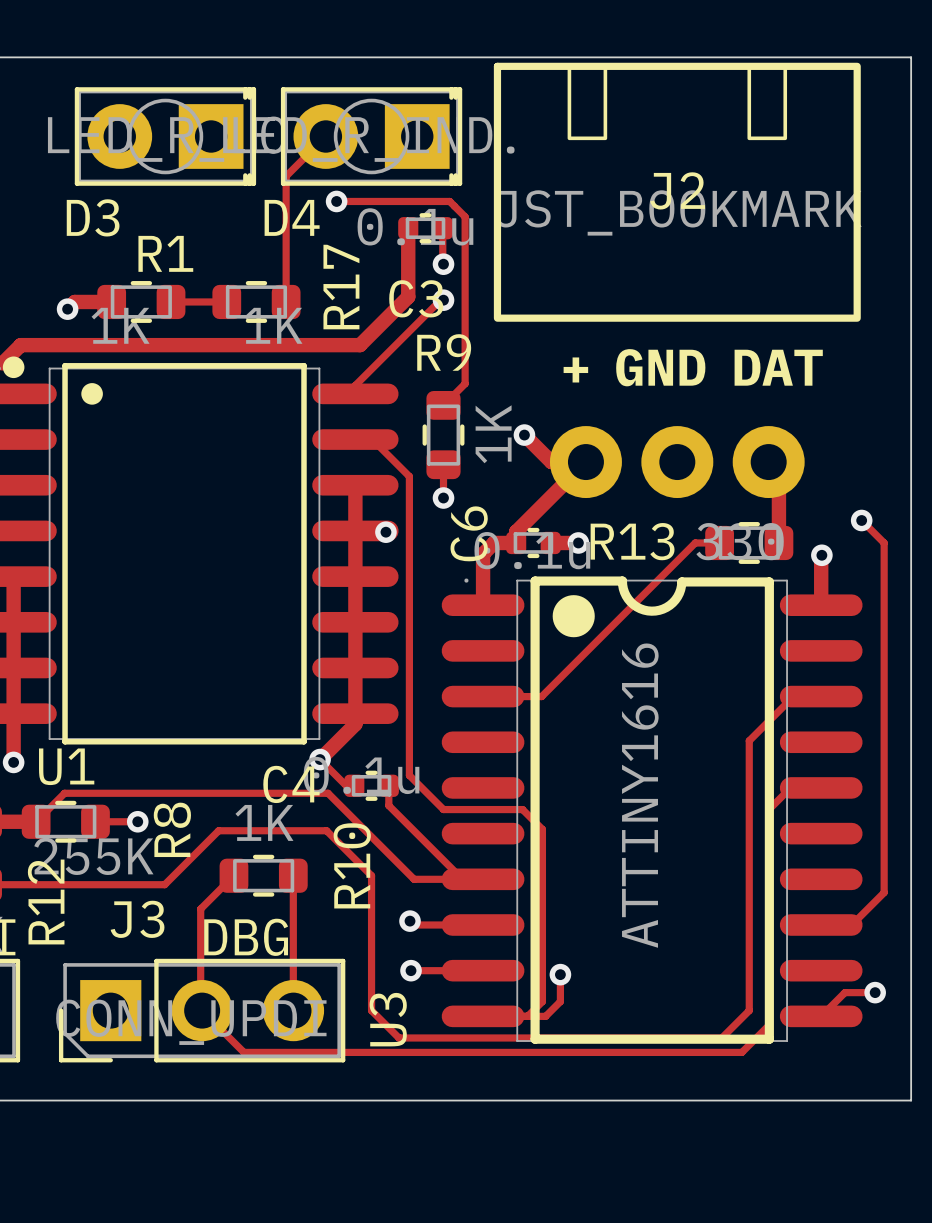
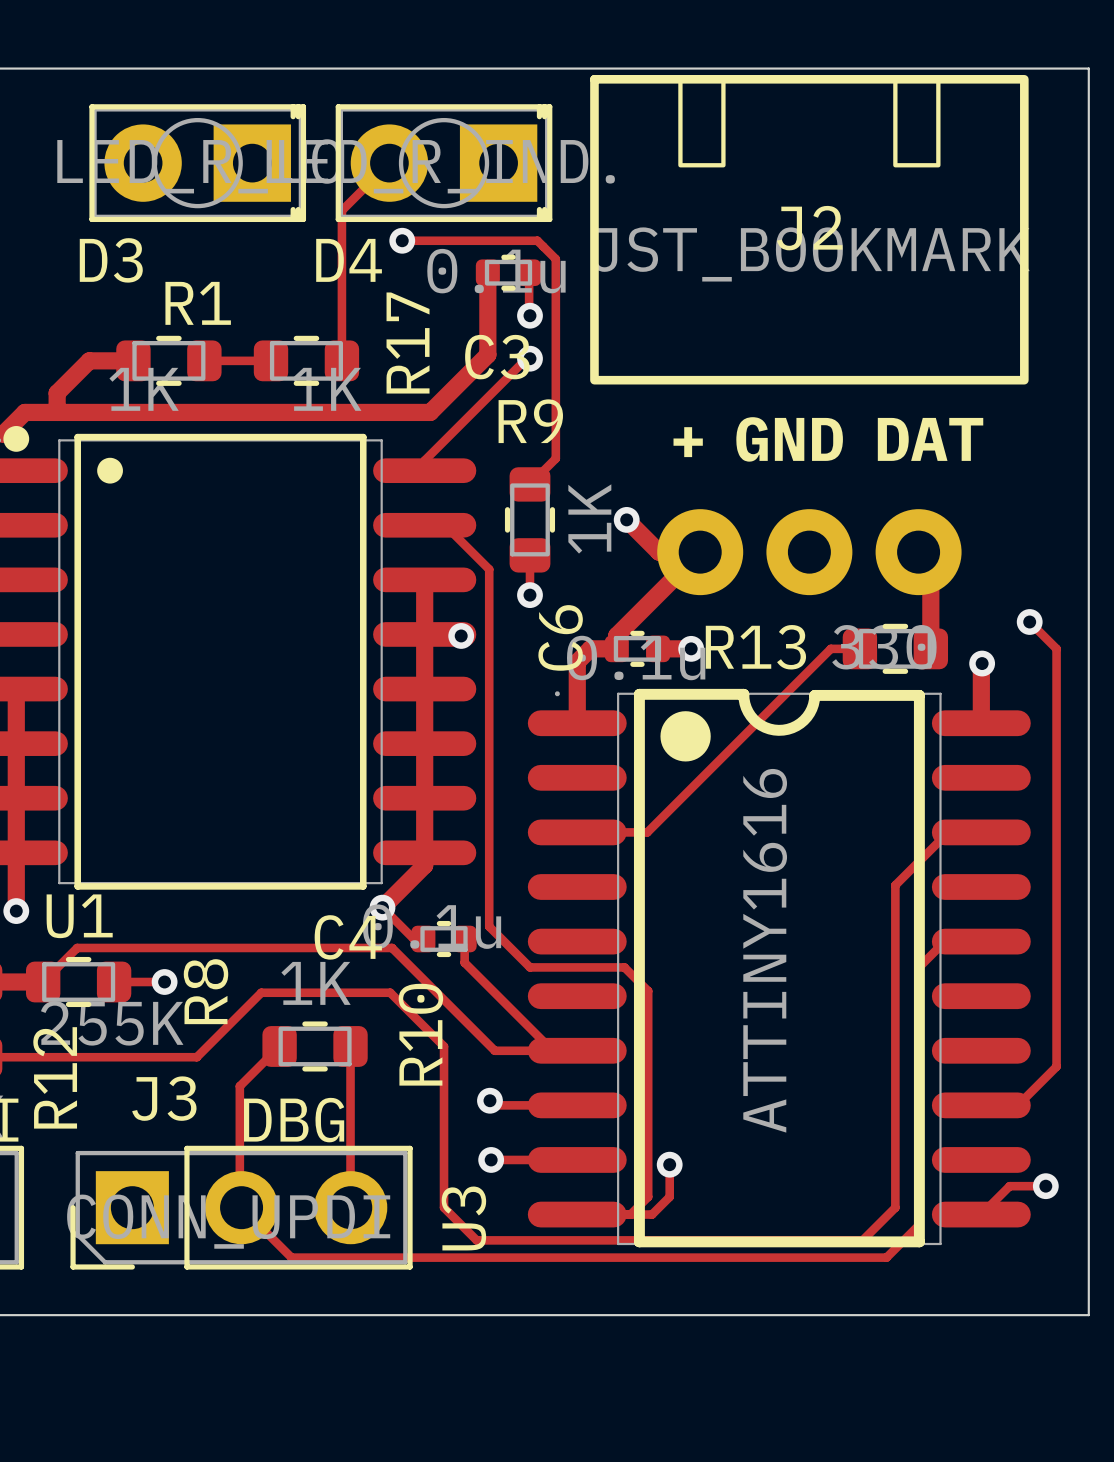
track: none -> (80, 369) (57, 393) (57, 412)
via: (67, 309) -> none

